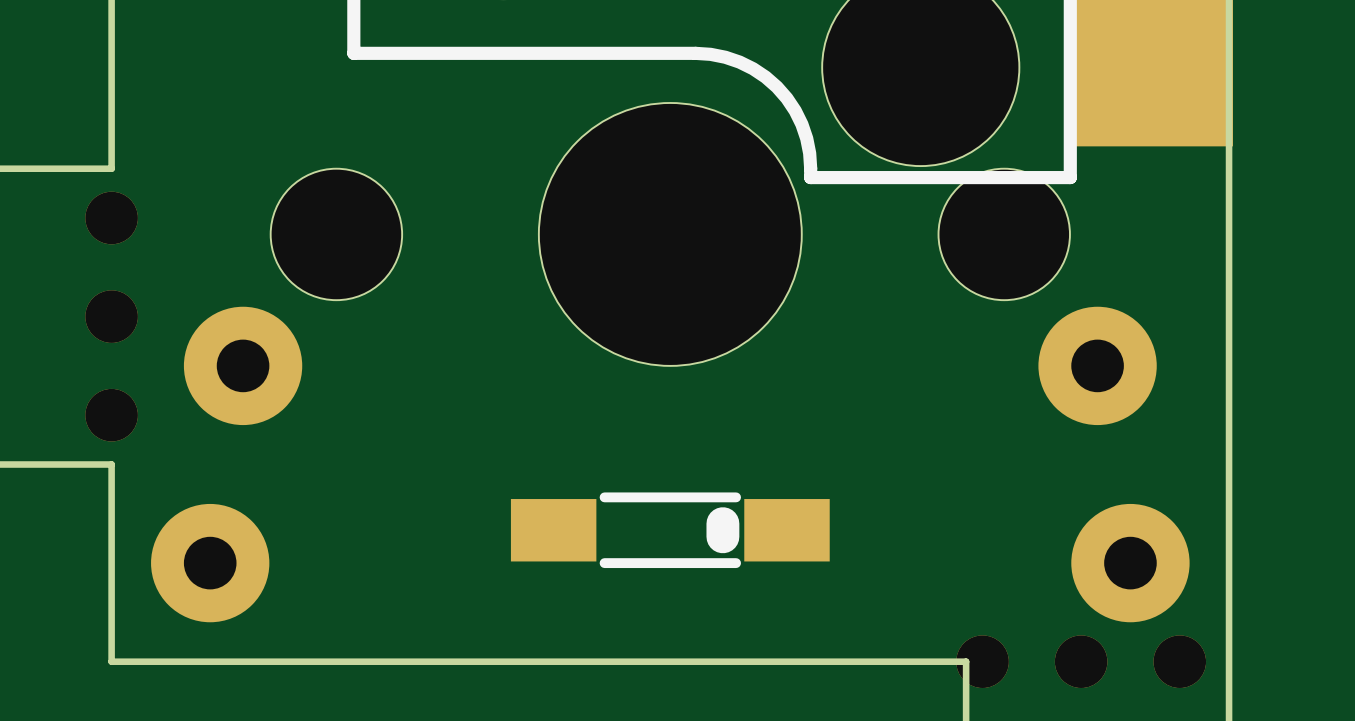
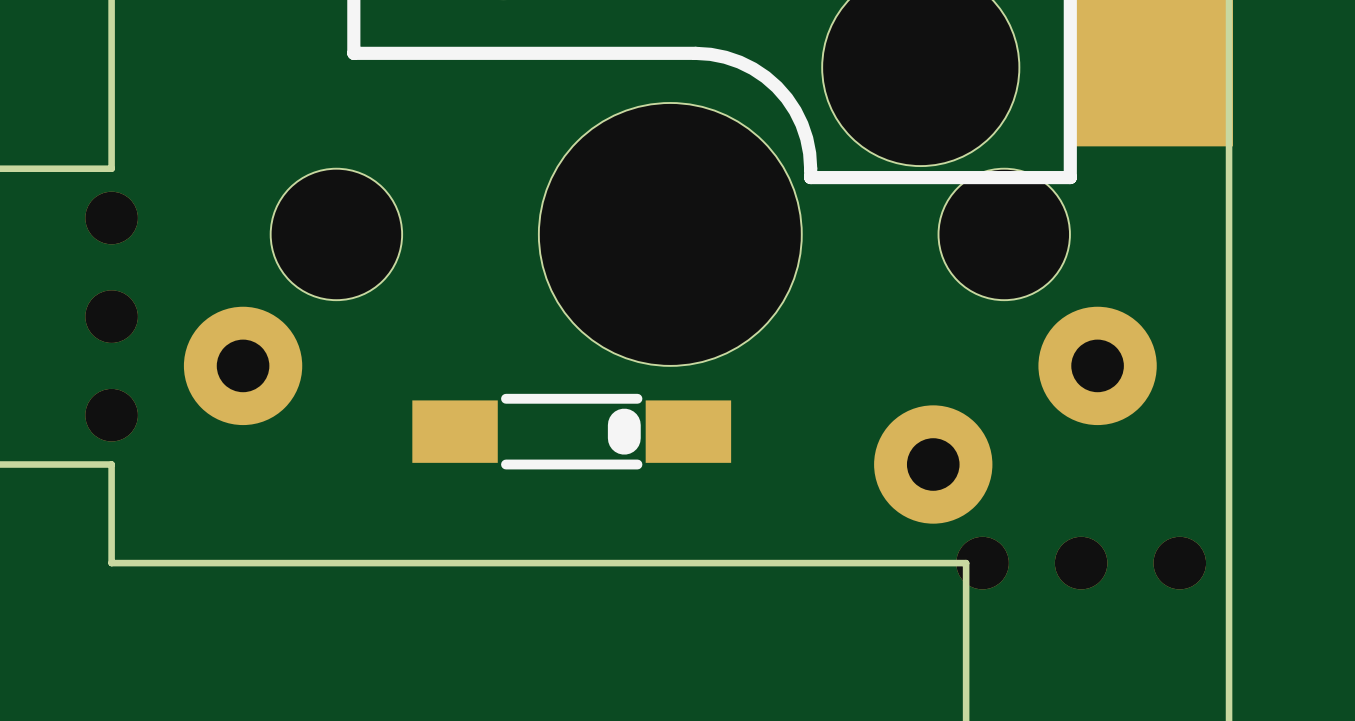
part position: (670, 530) -> (571, 431)
board edge: (111, 563) (111, 661) (966, 661) -> (111, 563) (966, 563) (966, 661)
part: (210, 563) -> none
part: none -> (1081, 563)
part position: (1130, 563) -> (933, 464)
part: (1081, 661) -> none

